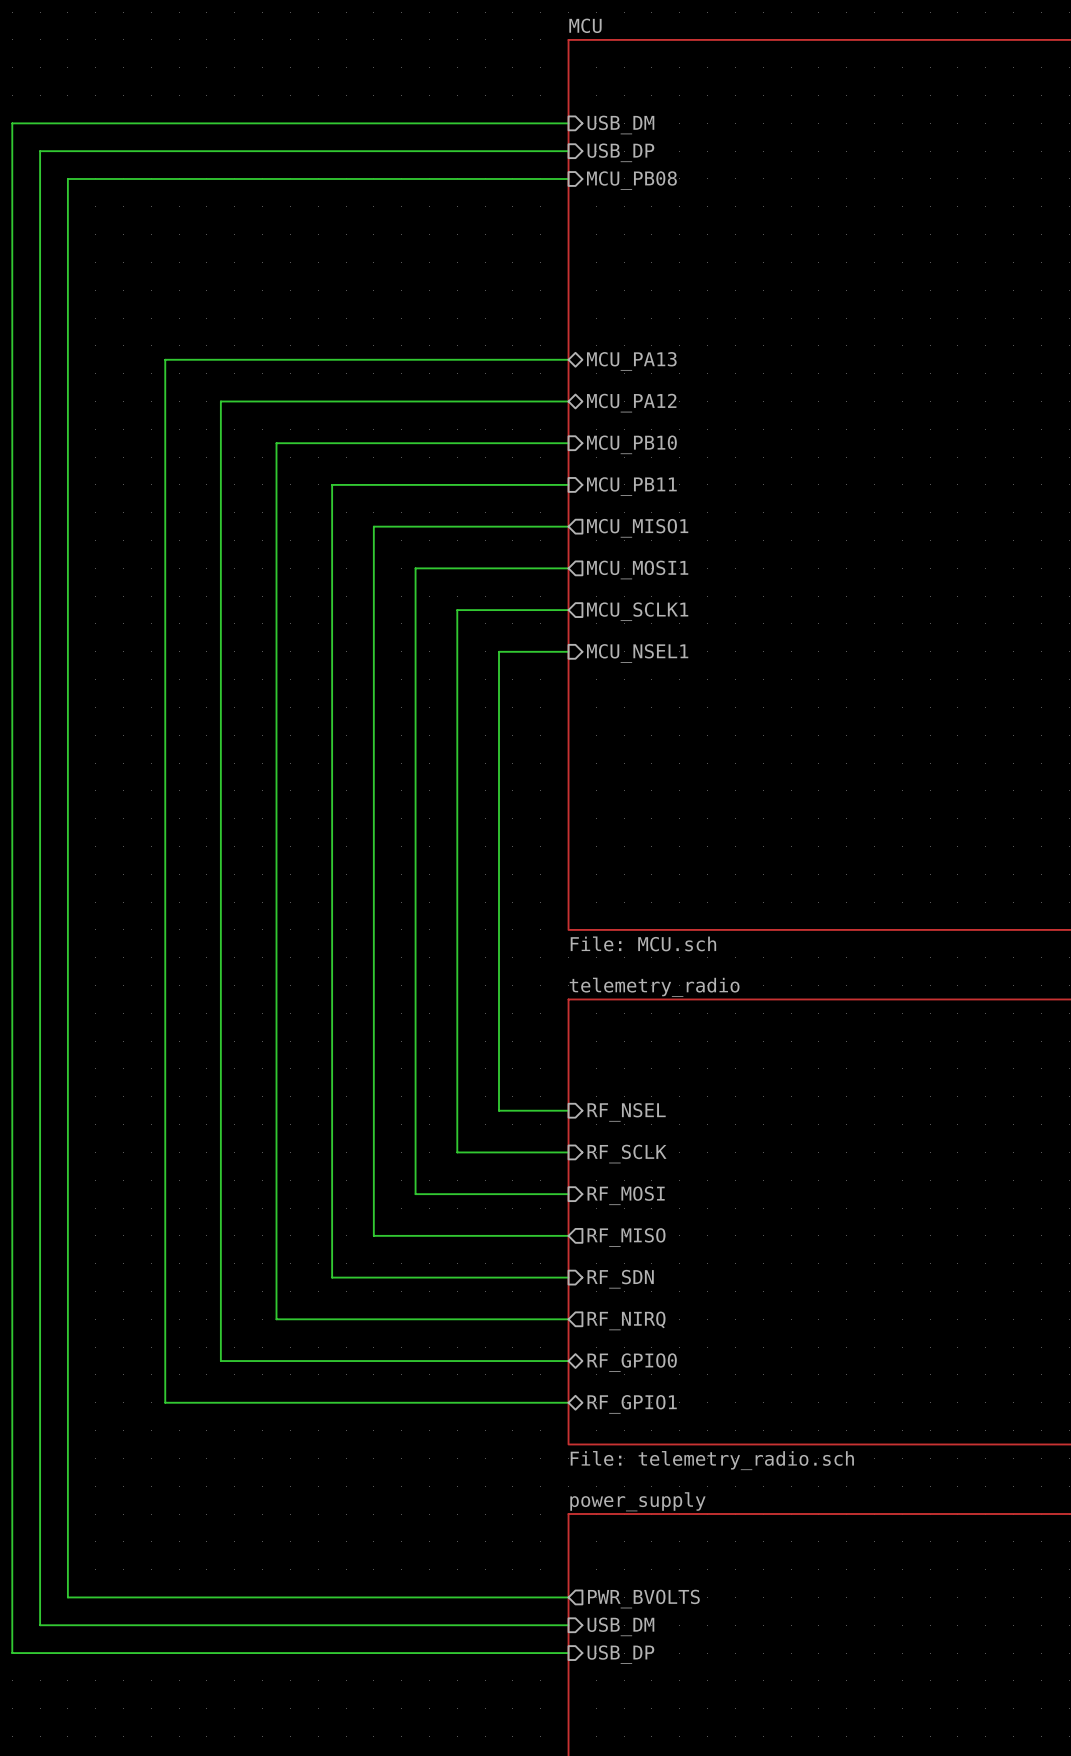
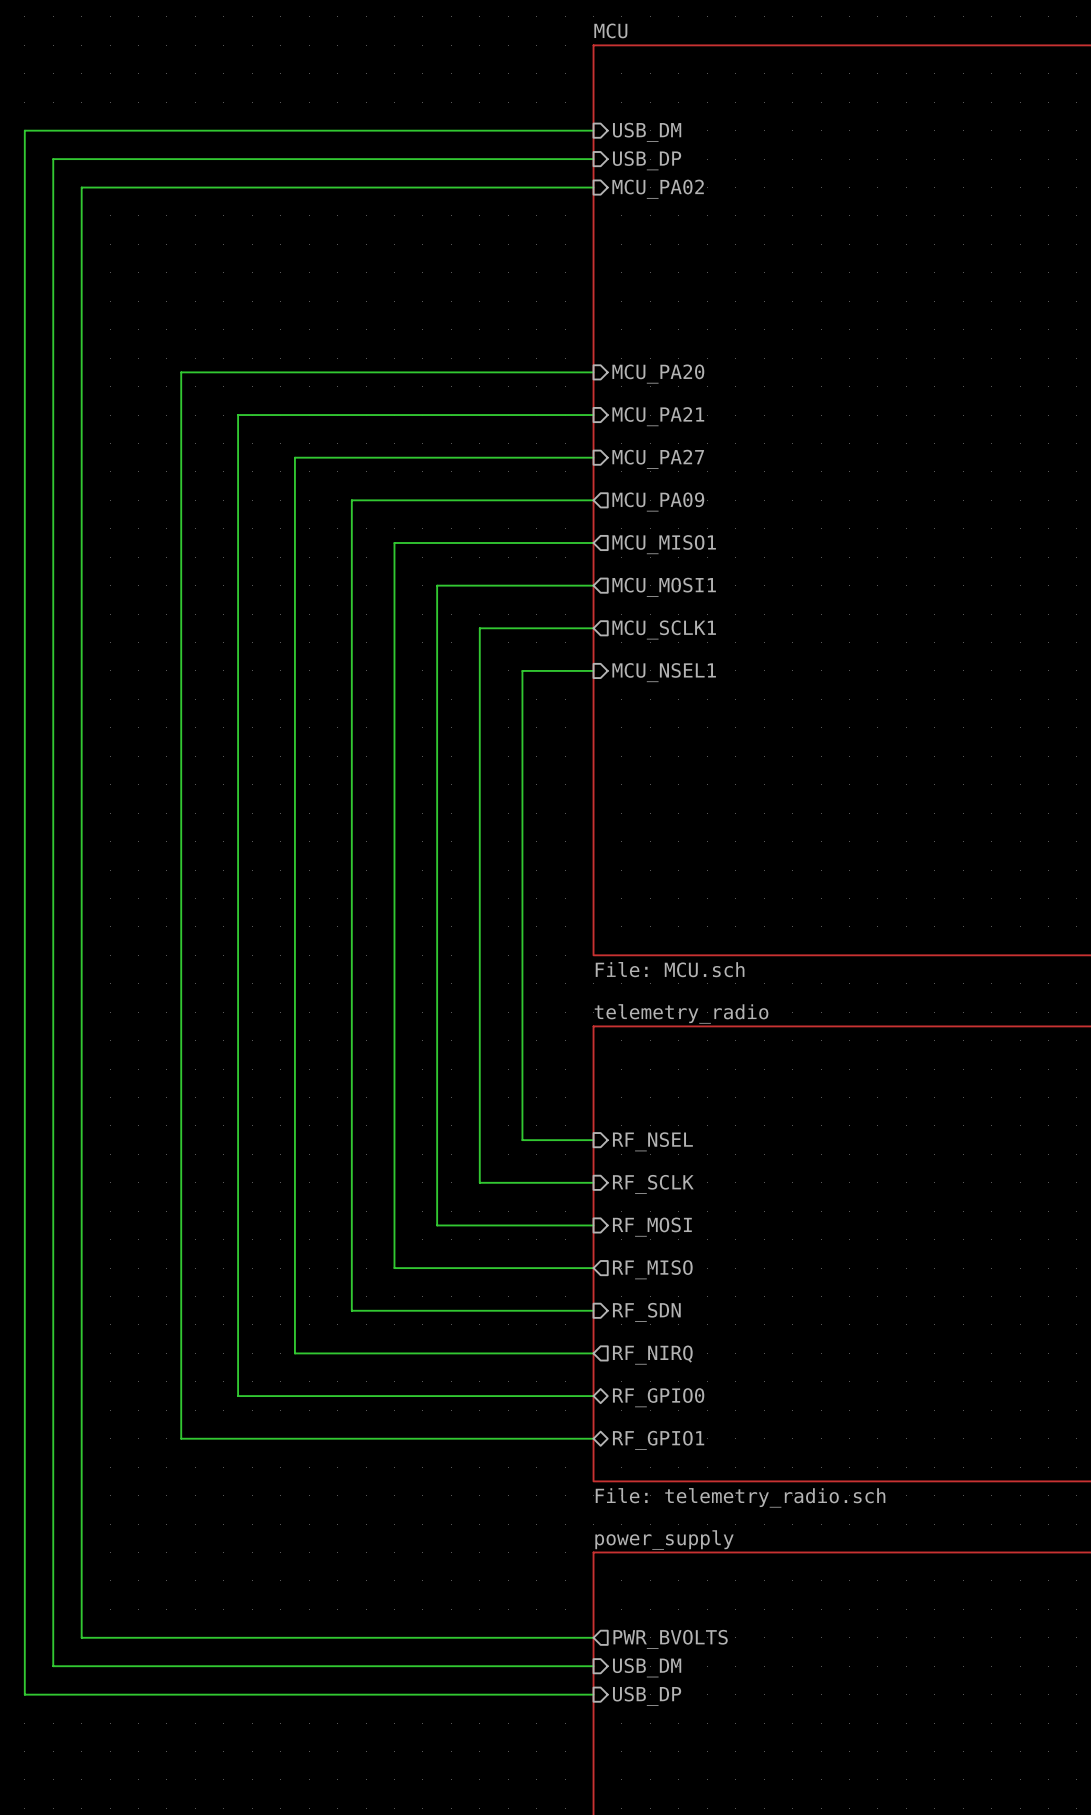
sheet pin: MCU_PB08 (631, 180) -> MCU_PA02 (658, 189)
sheet pin shape: bidirectional (631, 361) -> input (658, 374)
sheet pin: MCU_PA13 (631, 361) -> MCU_PA20 (658, 374)
sheet pin shape: bidirectional (631, 403) -> input (658, 416)
sheet pin: MCU_PA12 (631, 403) -> MCU_PA21 (658, 416)
sheet pin: MCU_PB10 (631, 444) -> MCU_PA27 (658, 459)
sheet pin shape: input (631, 486) -> output (658, 501)
sheet pin: MCU_PB11 (631, 486) -> MCU_PA09 (658, 501)

